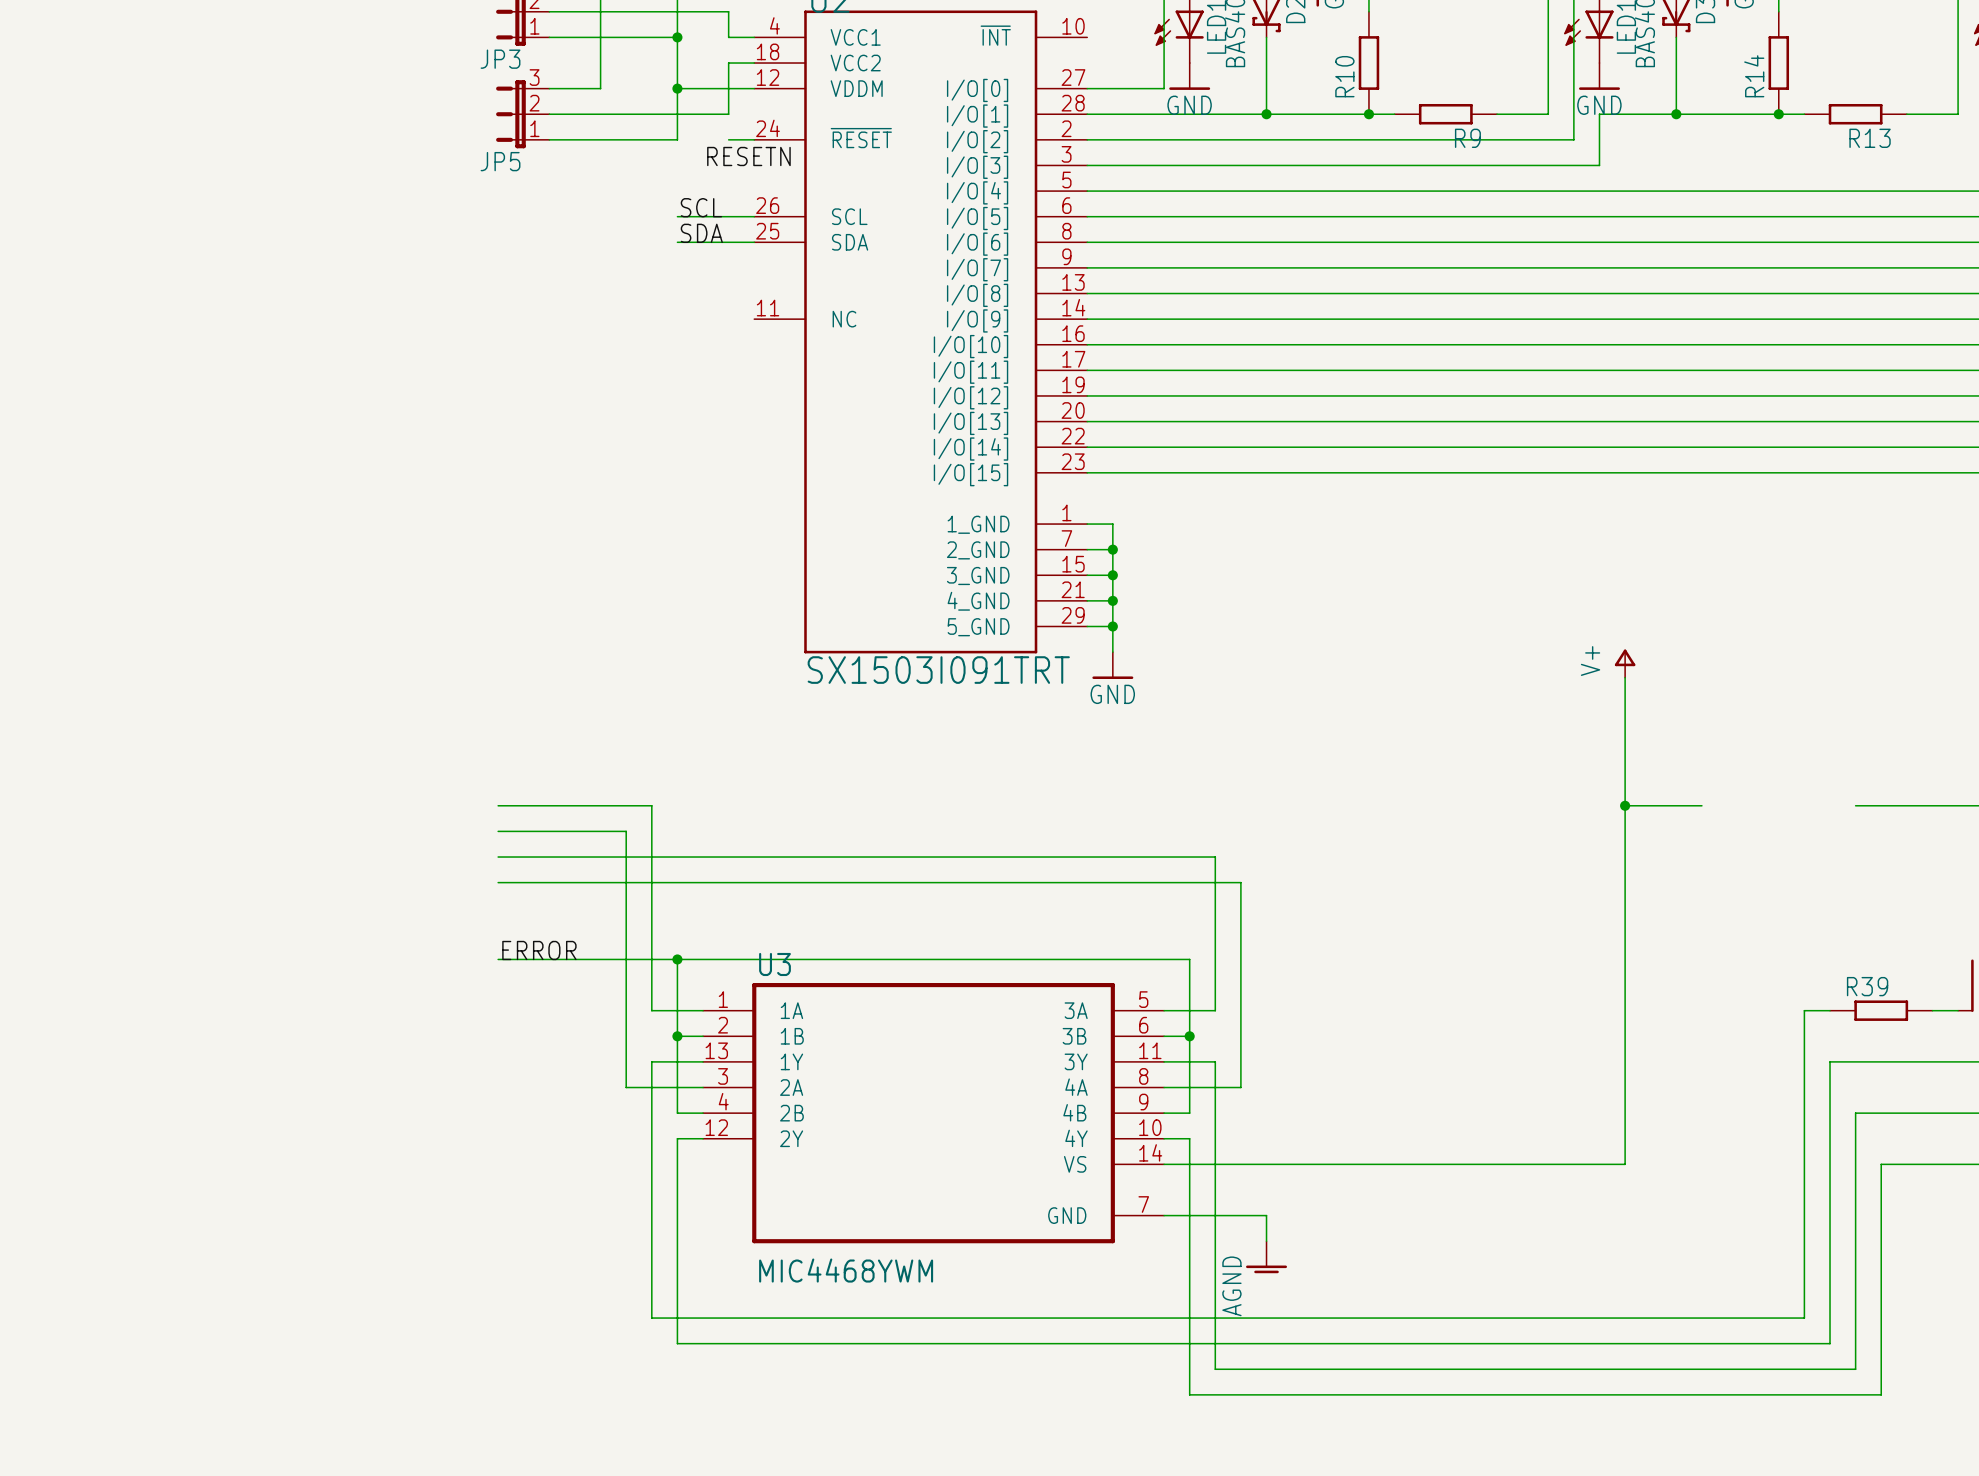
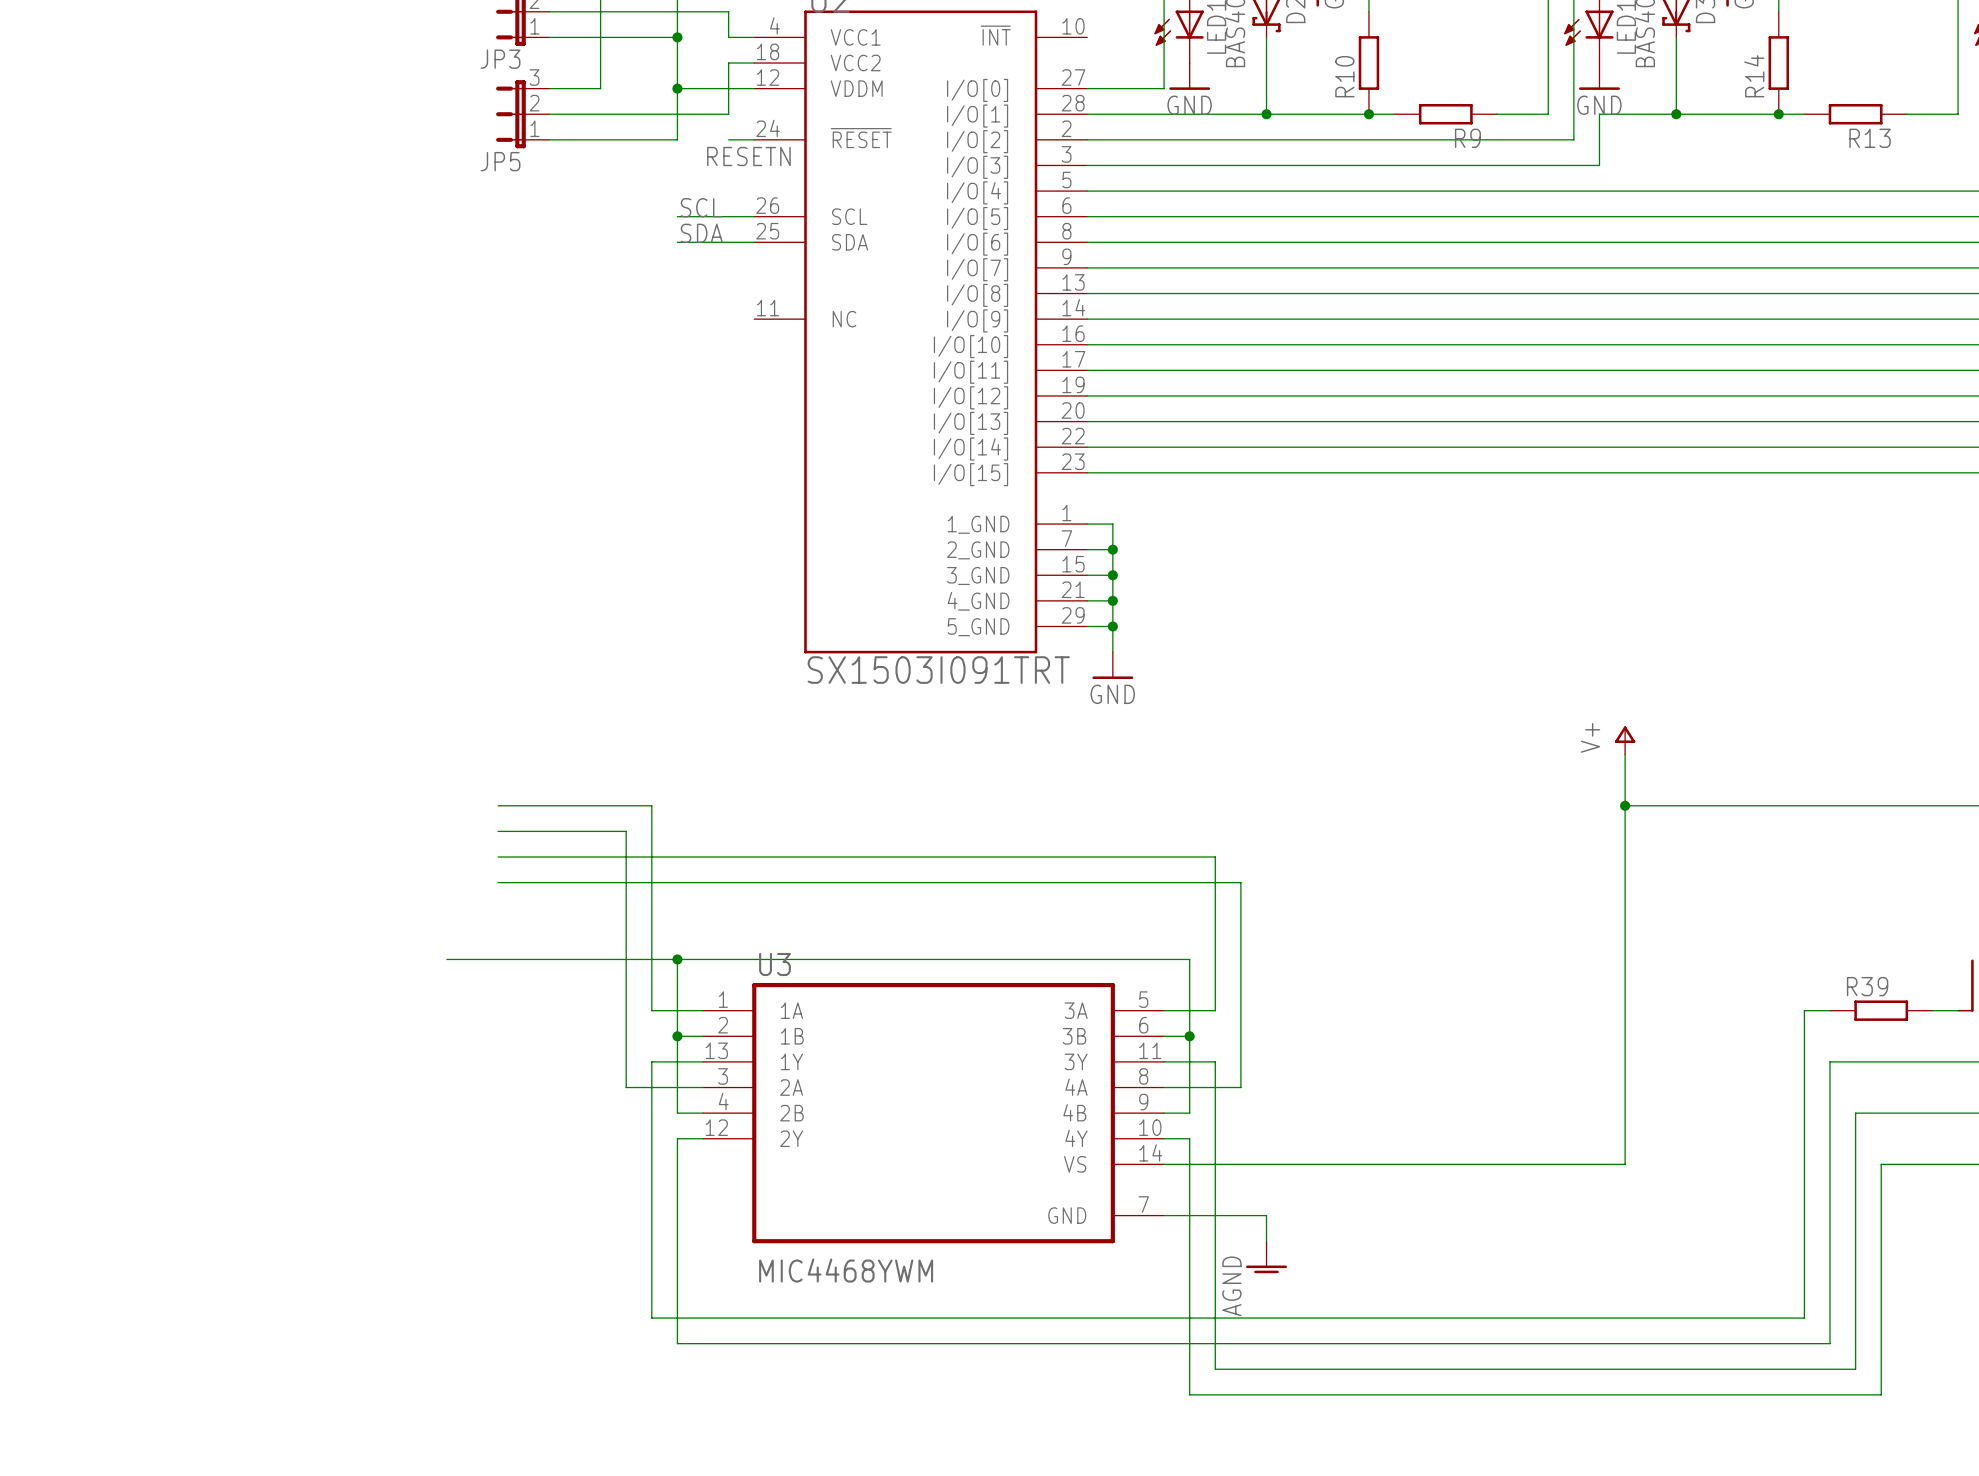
power symbol position: V+ (1625, 663) -> V+ (1625, 740)
wire: (1625, 677) (1625, 754) -> none
wire: none -> (1701, 805) (1855, 805)
label: ERROR (539, 950) -> none
wire: none -> (446, 959) (498, 959)

